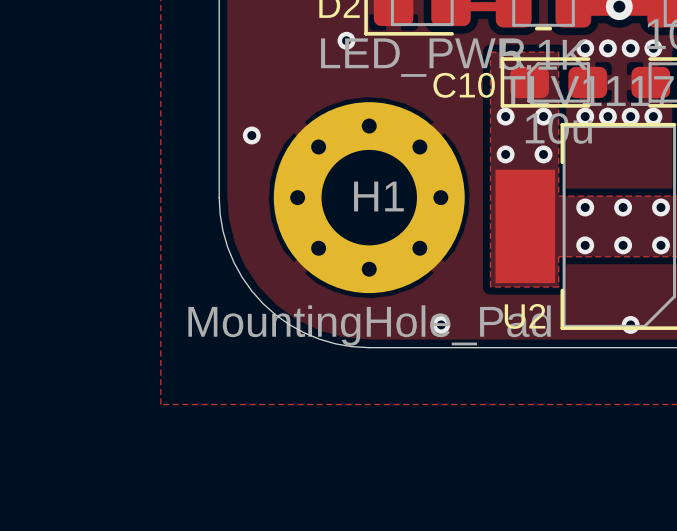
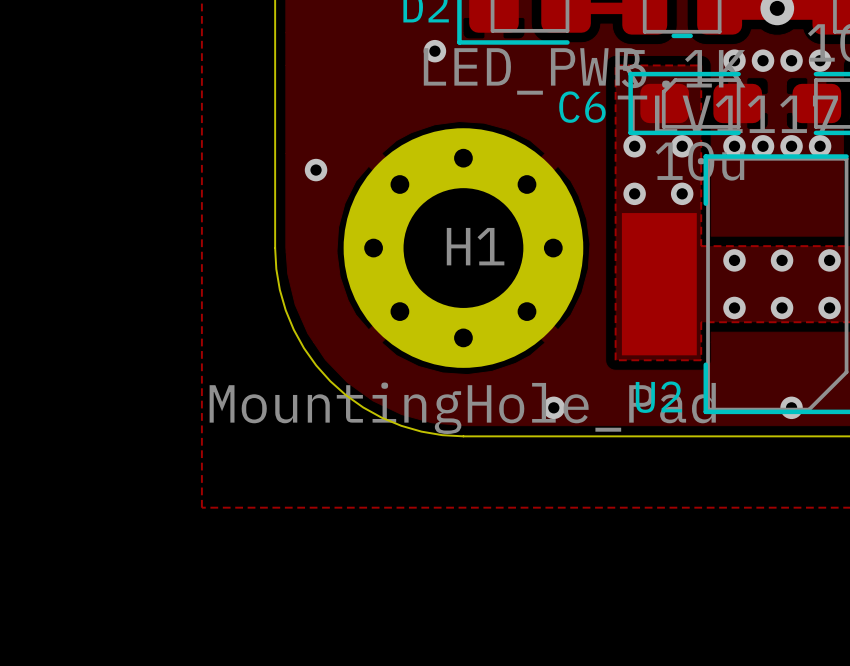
C10 name: C10 (464, 85) -> C6 (582, 107)

